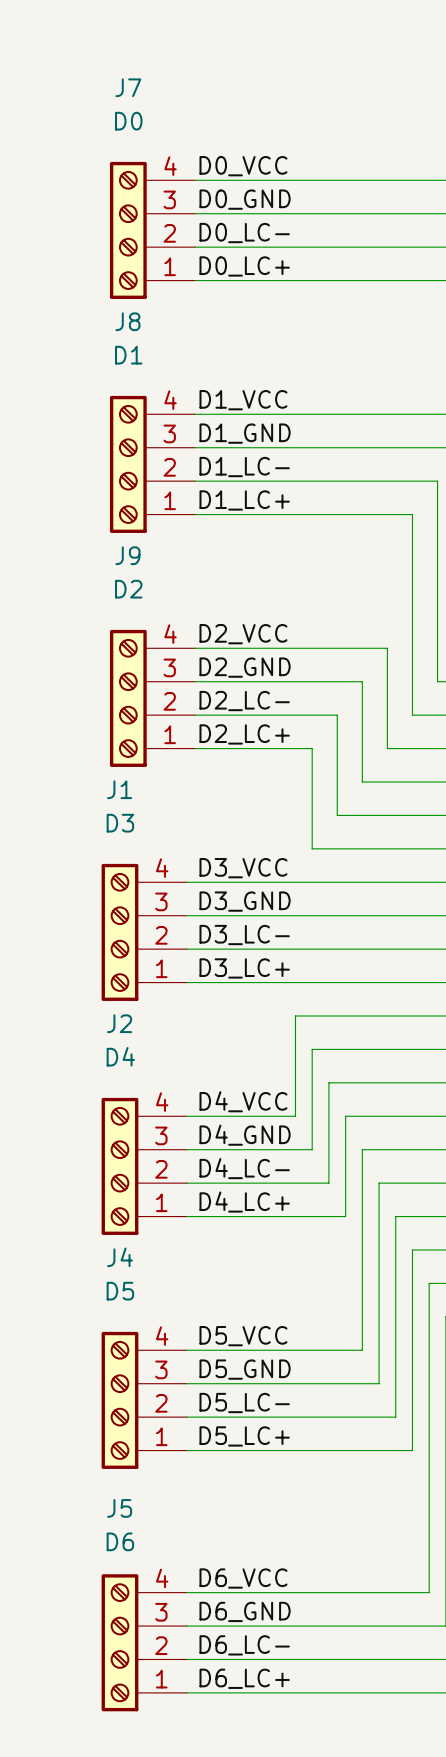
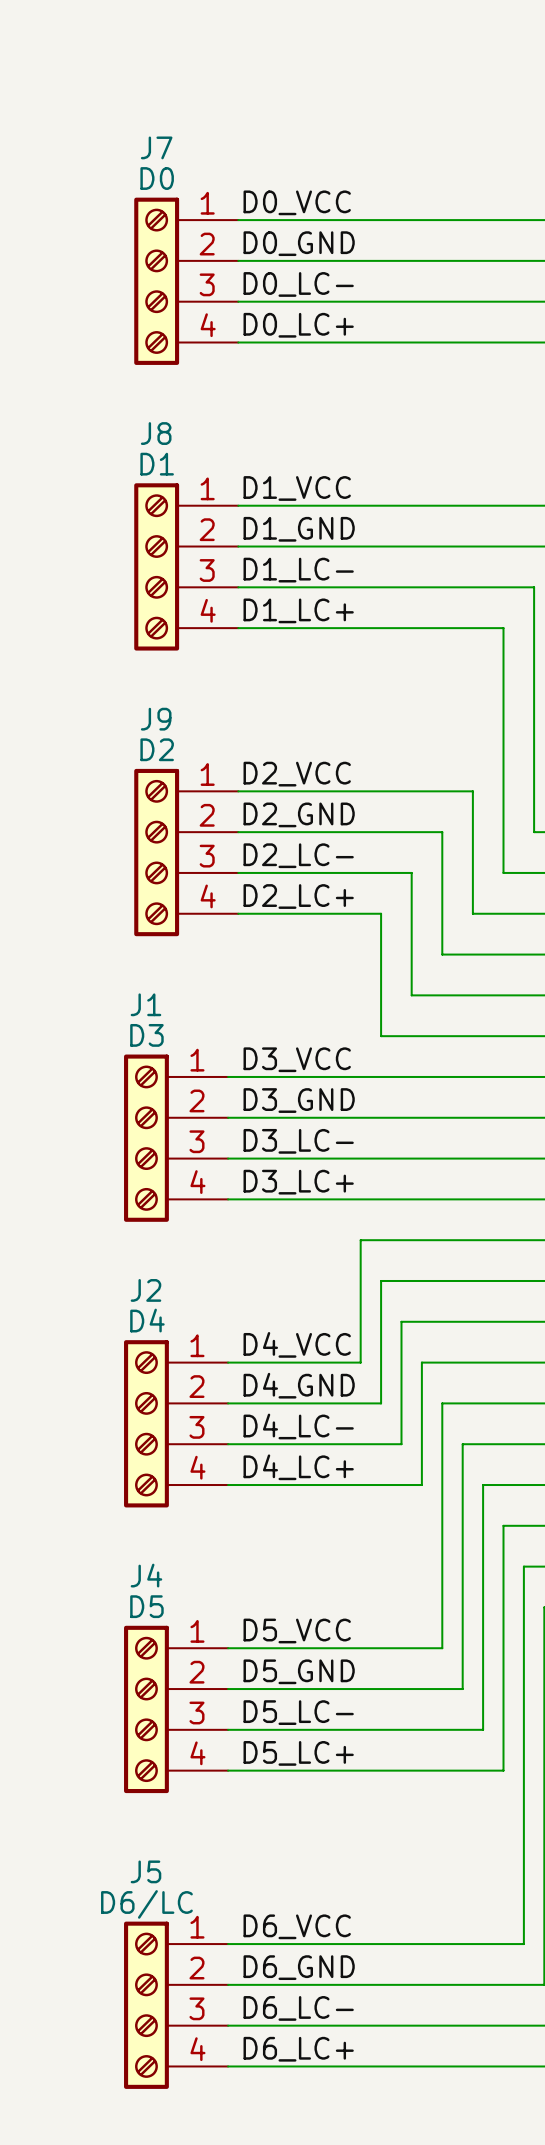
J7 name position: J7 (128, 87) -> J7 (156, 147)
J7 flip: as is (128, 230) -> up-down (156, 281)
J8 name position: J8 (127, 321) -> J8 (156, 433)
J8 flip: as is (128, 464) -> up-down (156, 566)
J9 name position: J9 (127, 555) -> J9 (156, 719)
J9 flip: as is (128, 698) -> up-down (156, 852)
J1 name position: J1 (119, 789) -> J1 (145, 1004)
J1 flip: as is (119, 932) -> up-down (146, 1138)
J2 name position: J2 (119, 1023) -> J2 (145, 1290)
J2 flip: as is (119, 1166) -> up-down (146, 1423)
J4 name position: J4 (119, 1257) -> J4 (146, 1575)
J4 flip: as is (119, 1400) -> up-down (146, 1709)
J5 value: D6 (120, 1541) -> D6/LC (146, 1904)
J5 flip: as is (119, 1642) -> up-down (146, 2005)

